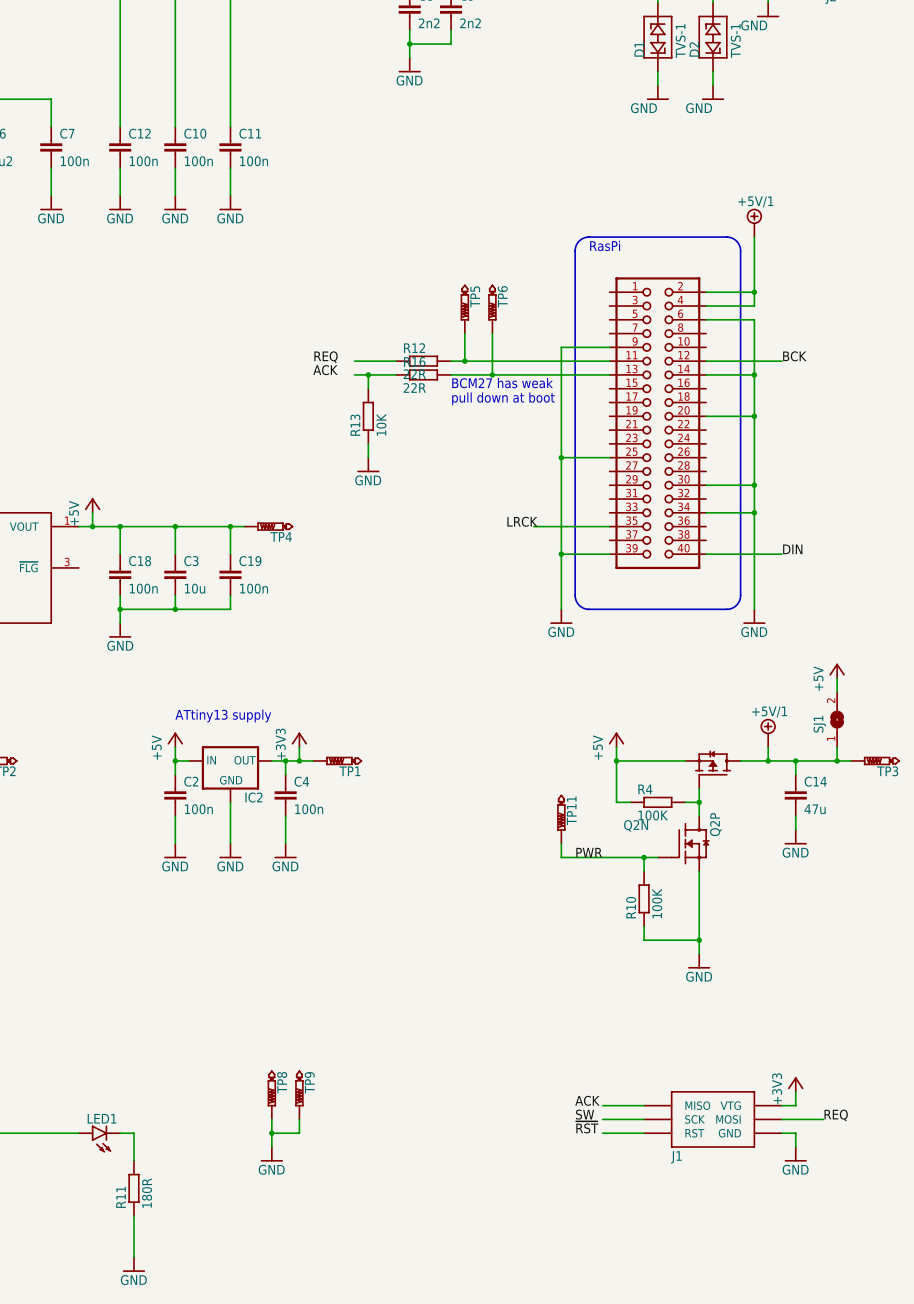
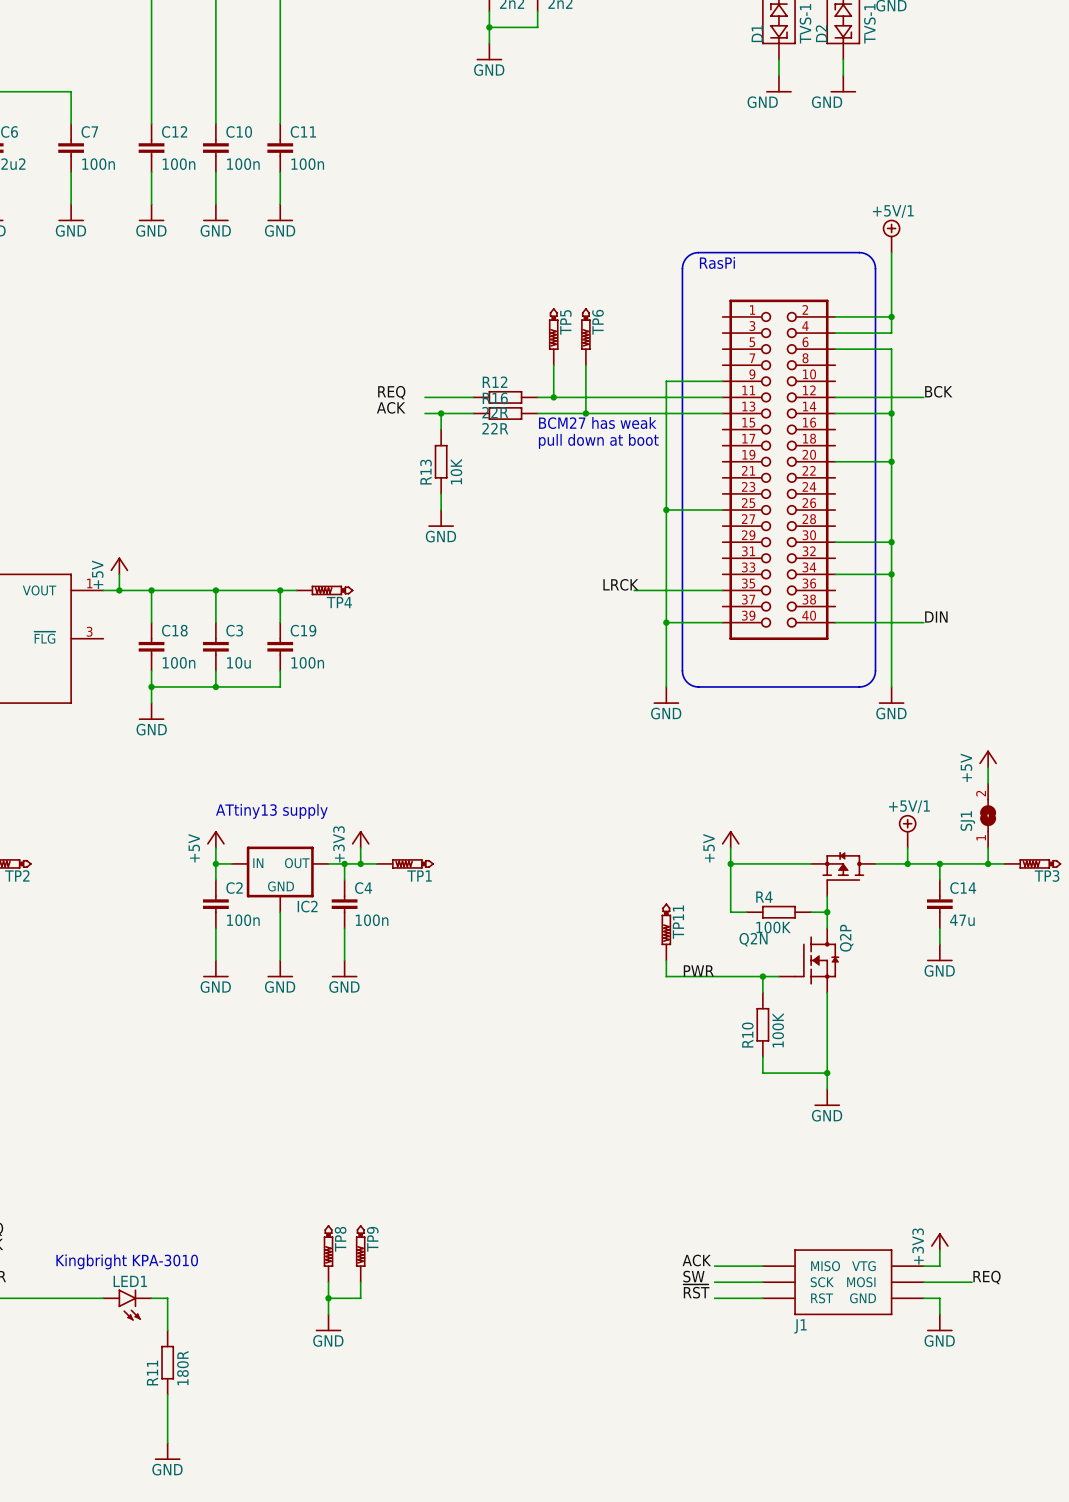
text: none -> Kingbright KPA-3010 (127, 1261)

